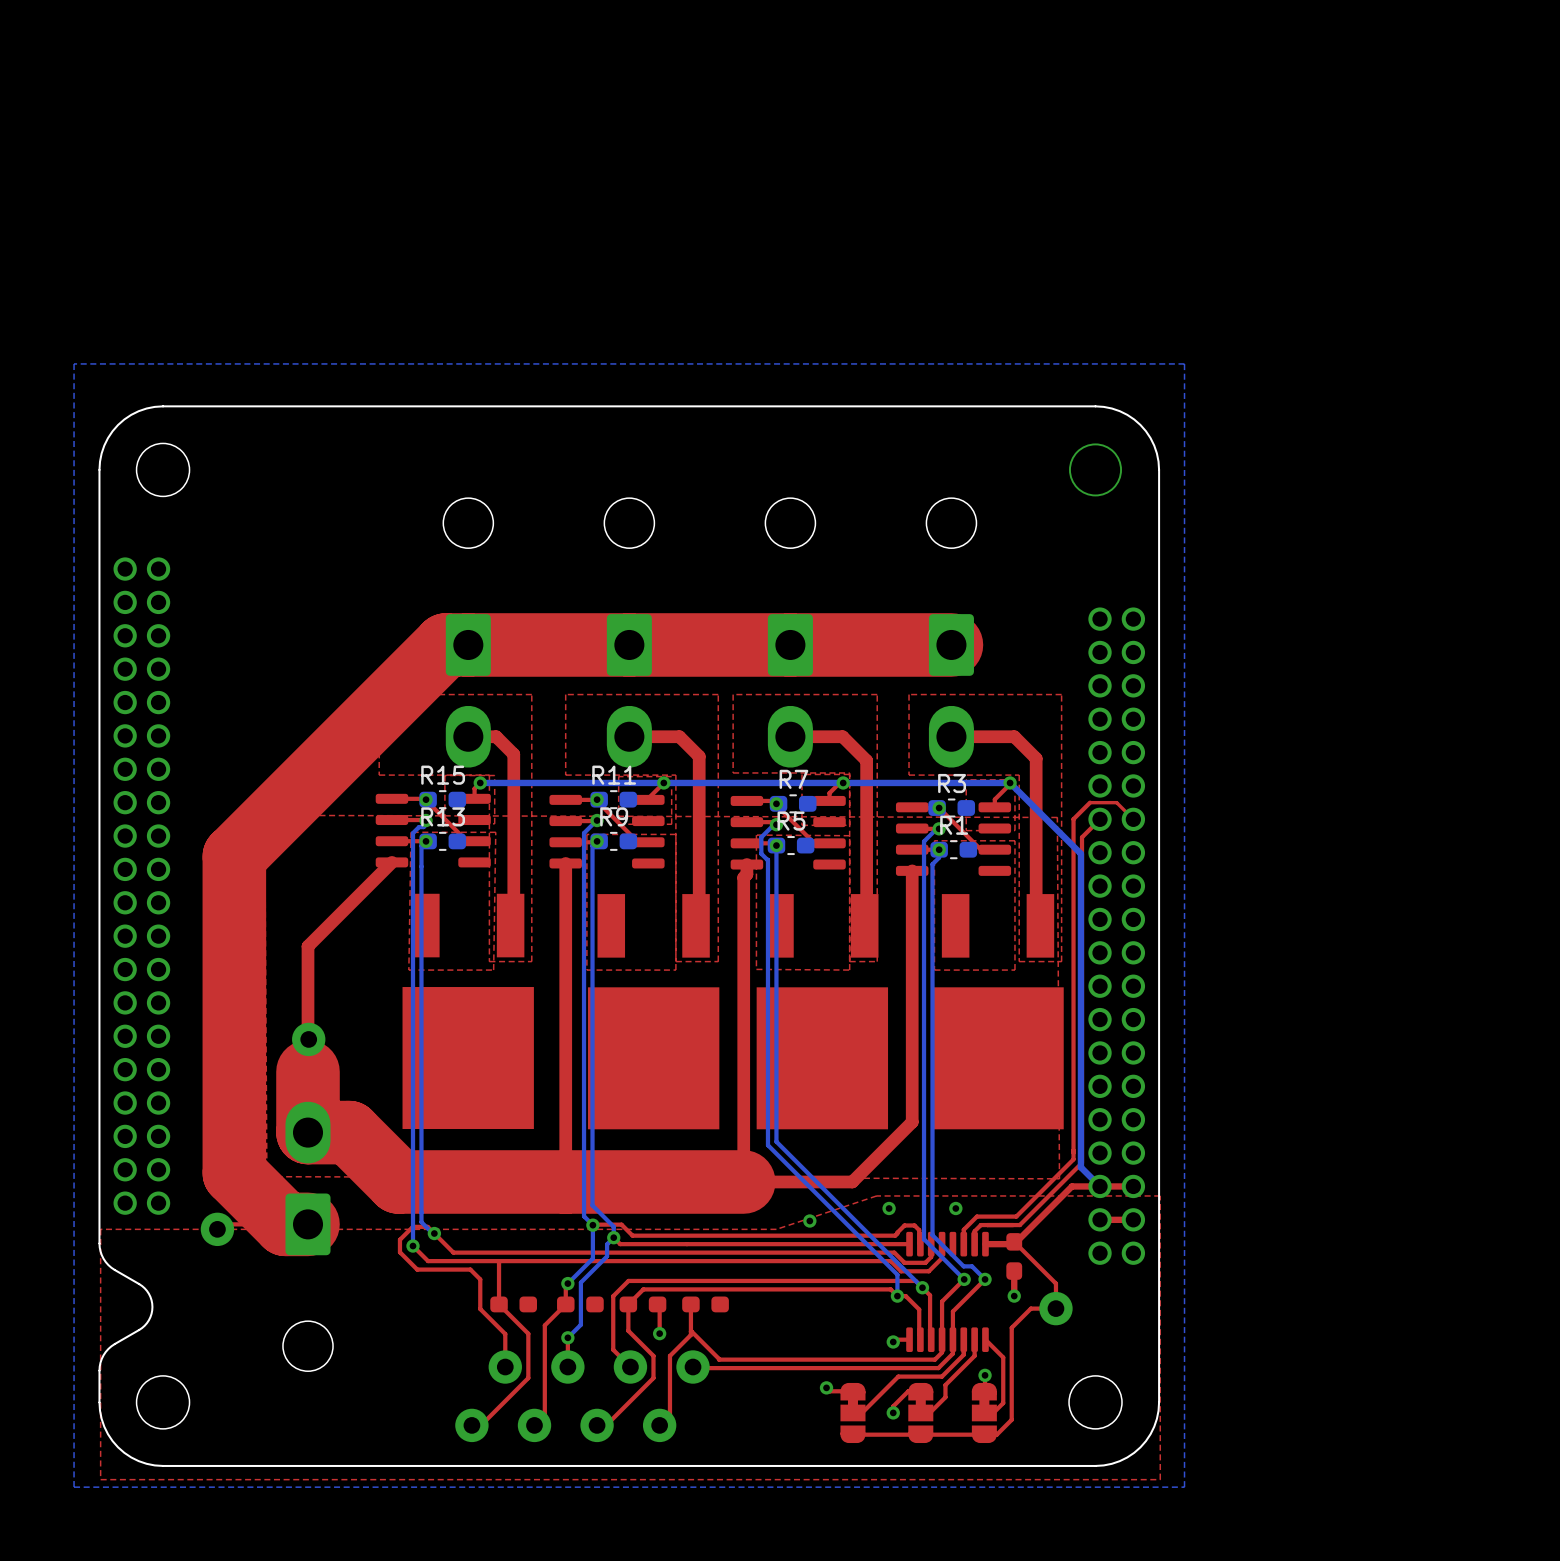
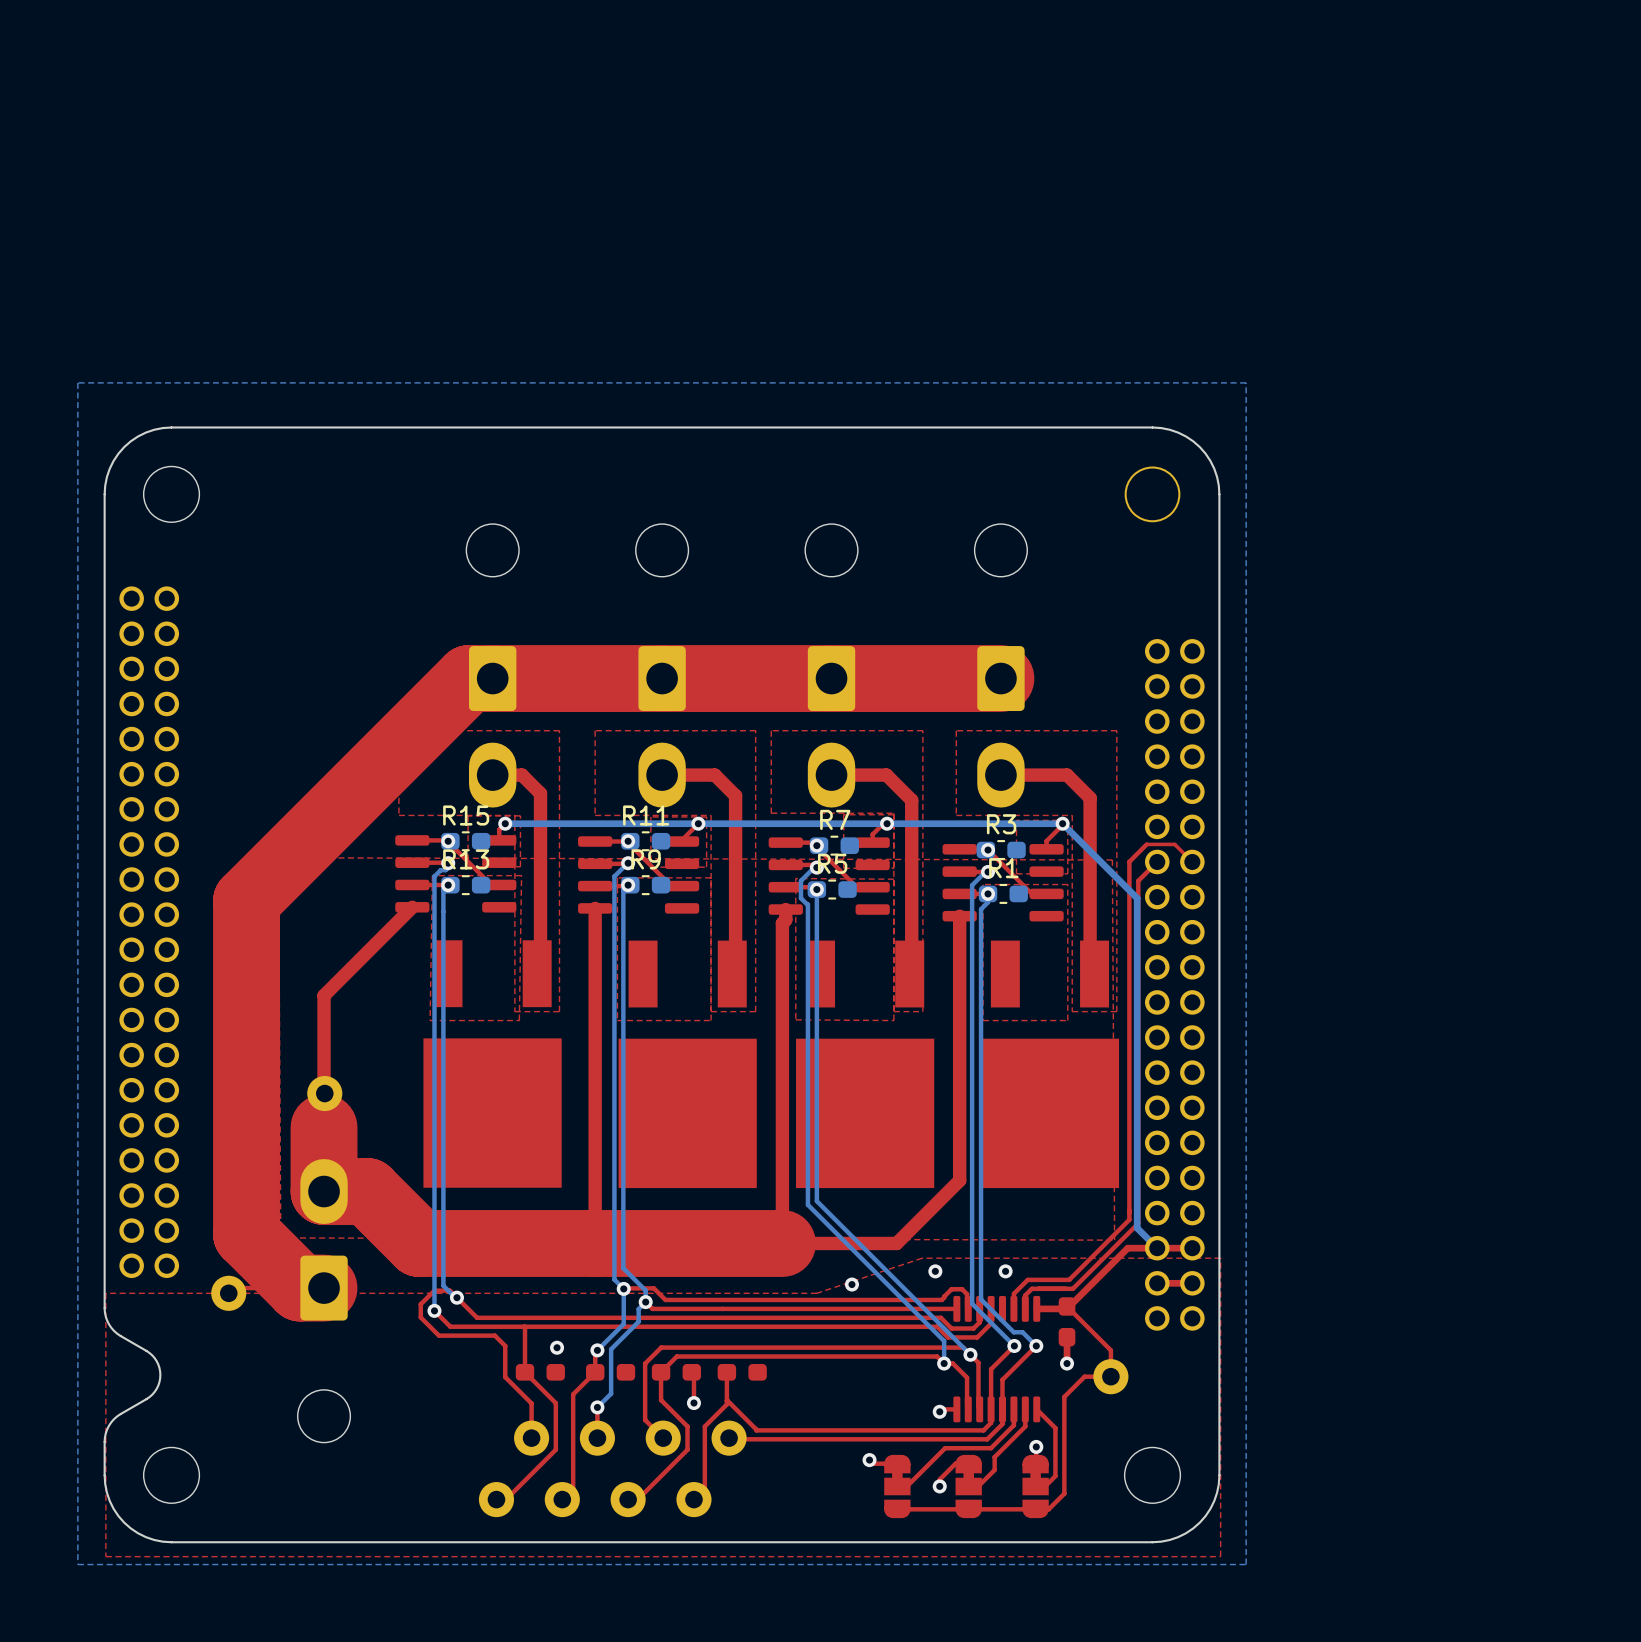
via: none -> (557, 1347)

